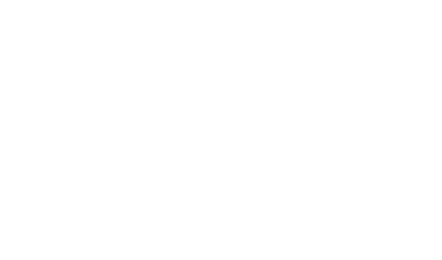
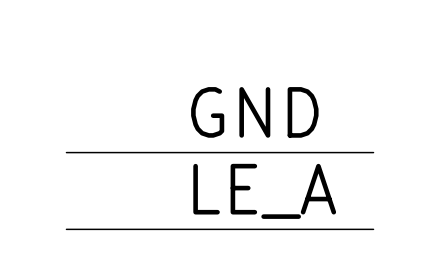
label: none -> GND (254, 112)
wire: none -> (66, 152) (373, 152)
label: none -> LE_A (264, 191)
wire: none -> (66, 229) (373, 229)

